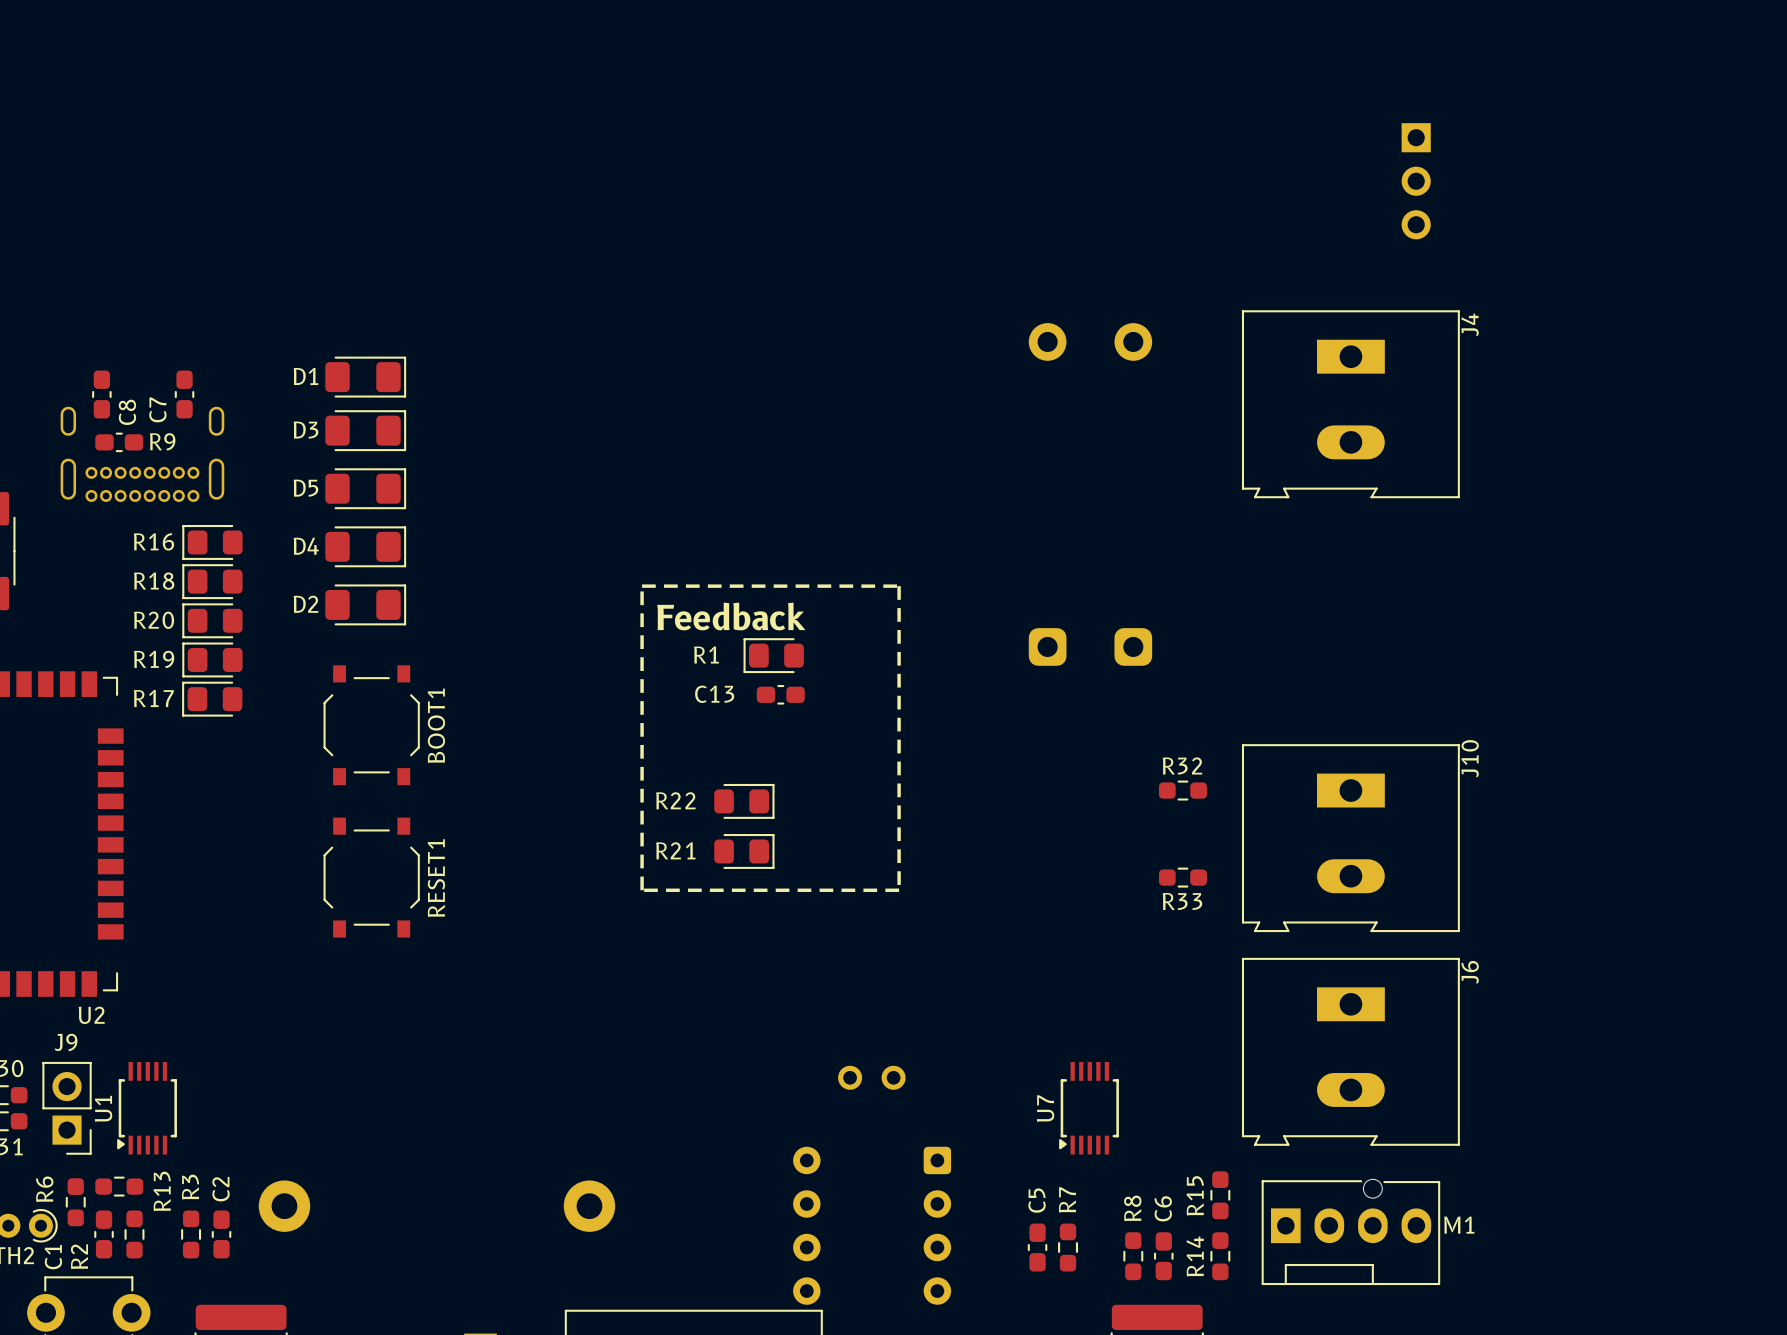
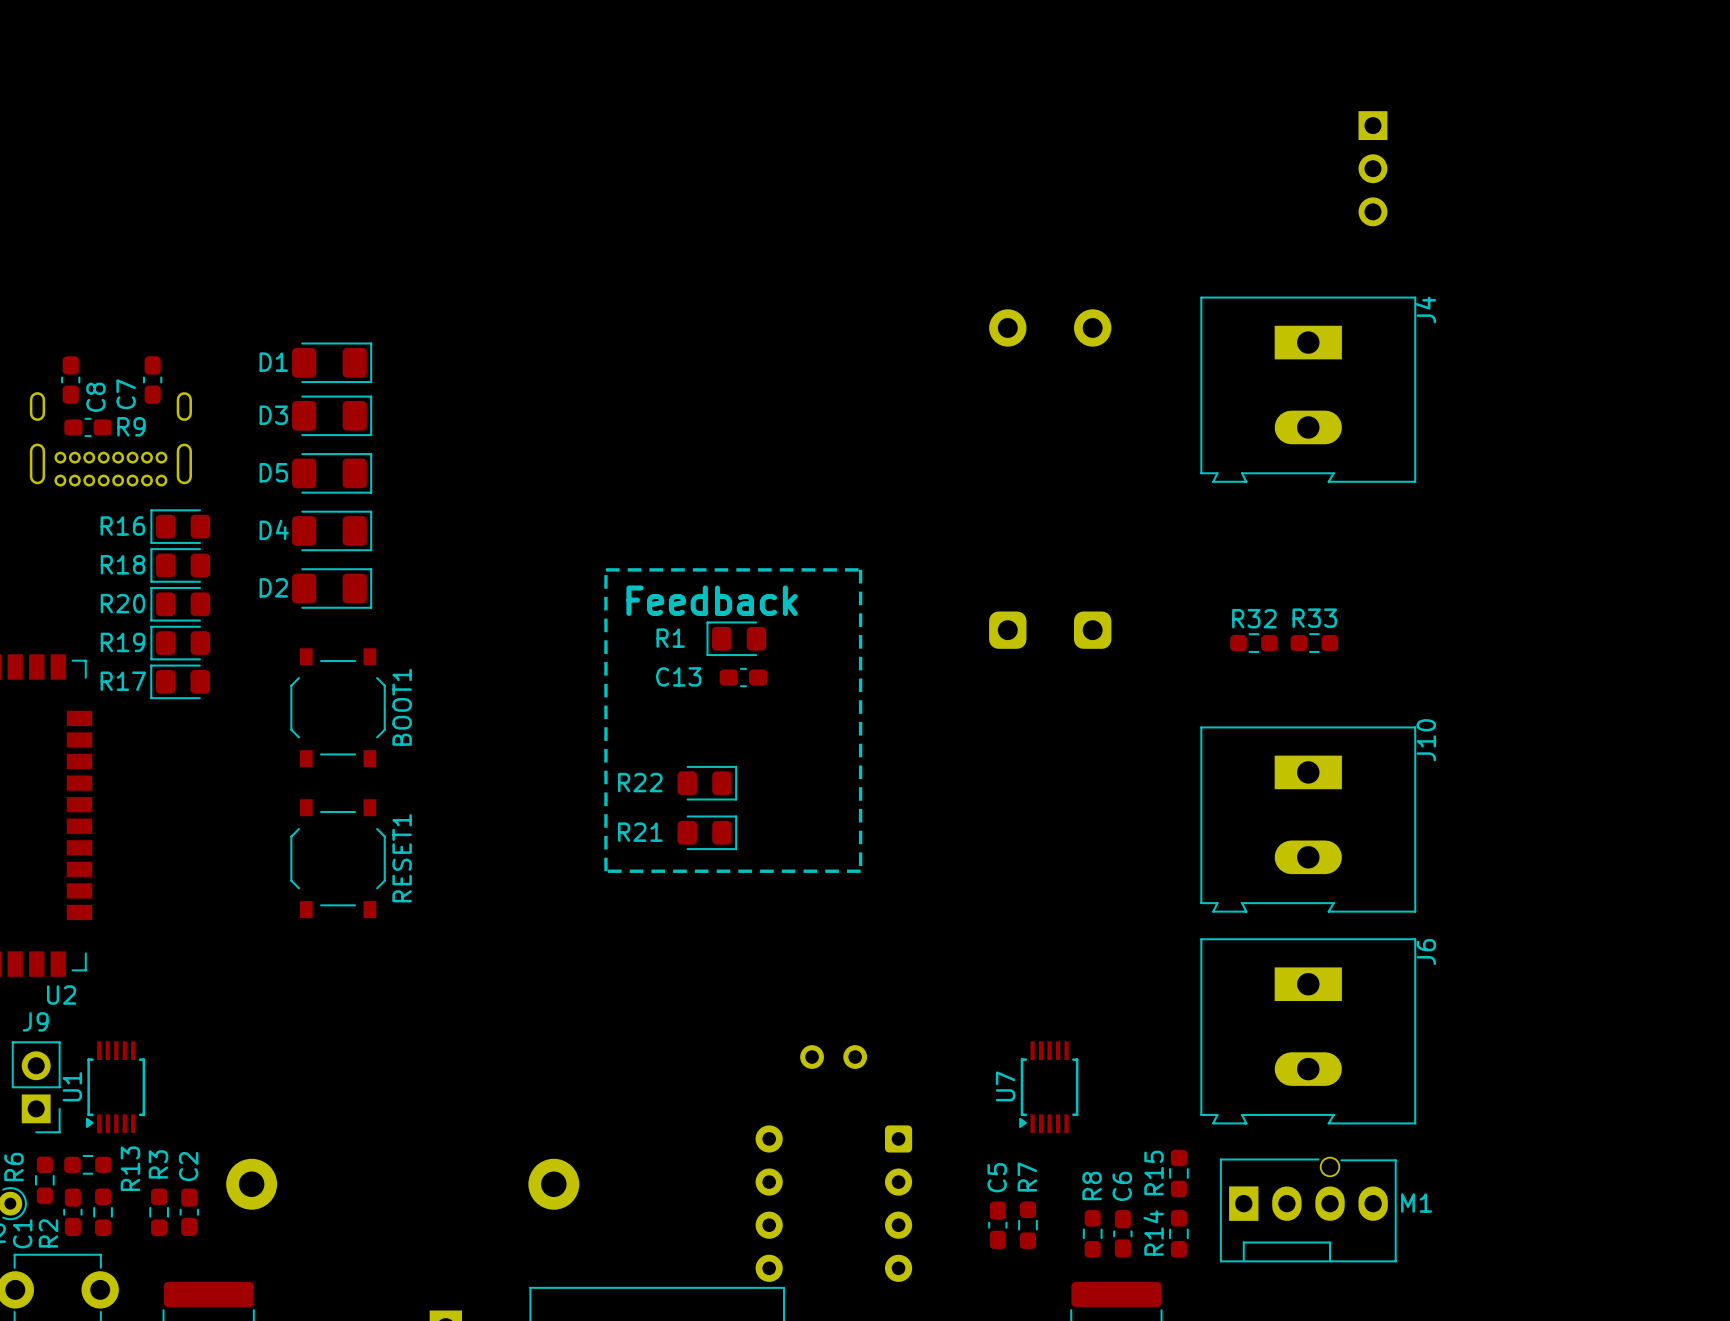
R32 position: (1182, 790) -> (1253, 643)
R33 position: (1182, 877) -> (1314, 643)
R33 name position: R33 (1182, 901) -> R33 (1314, 618)

